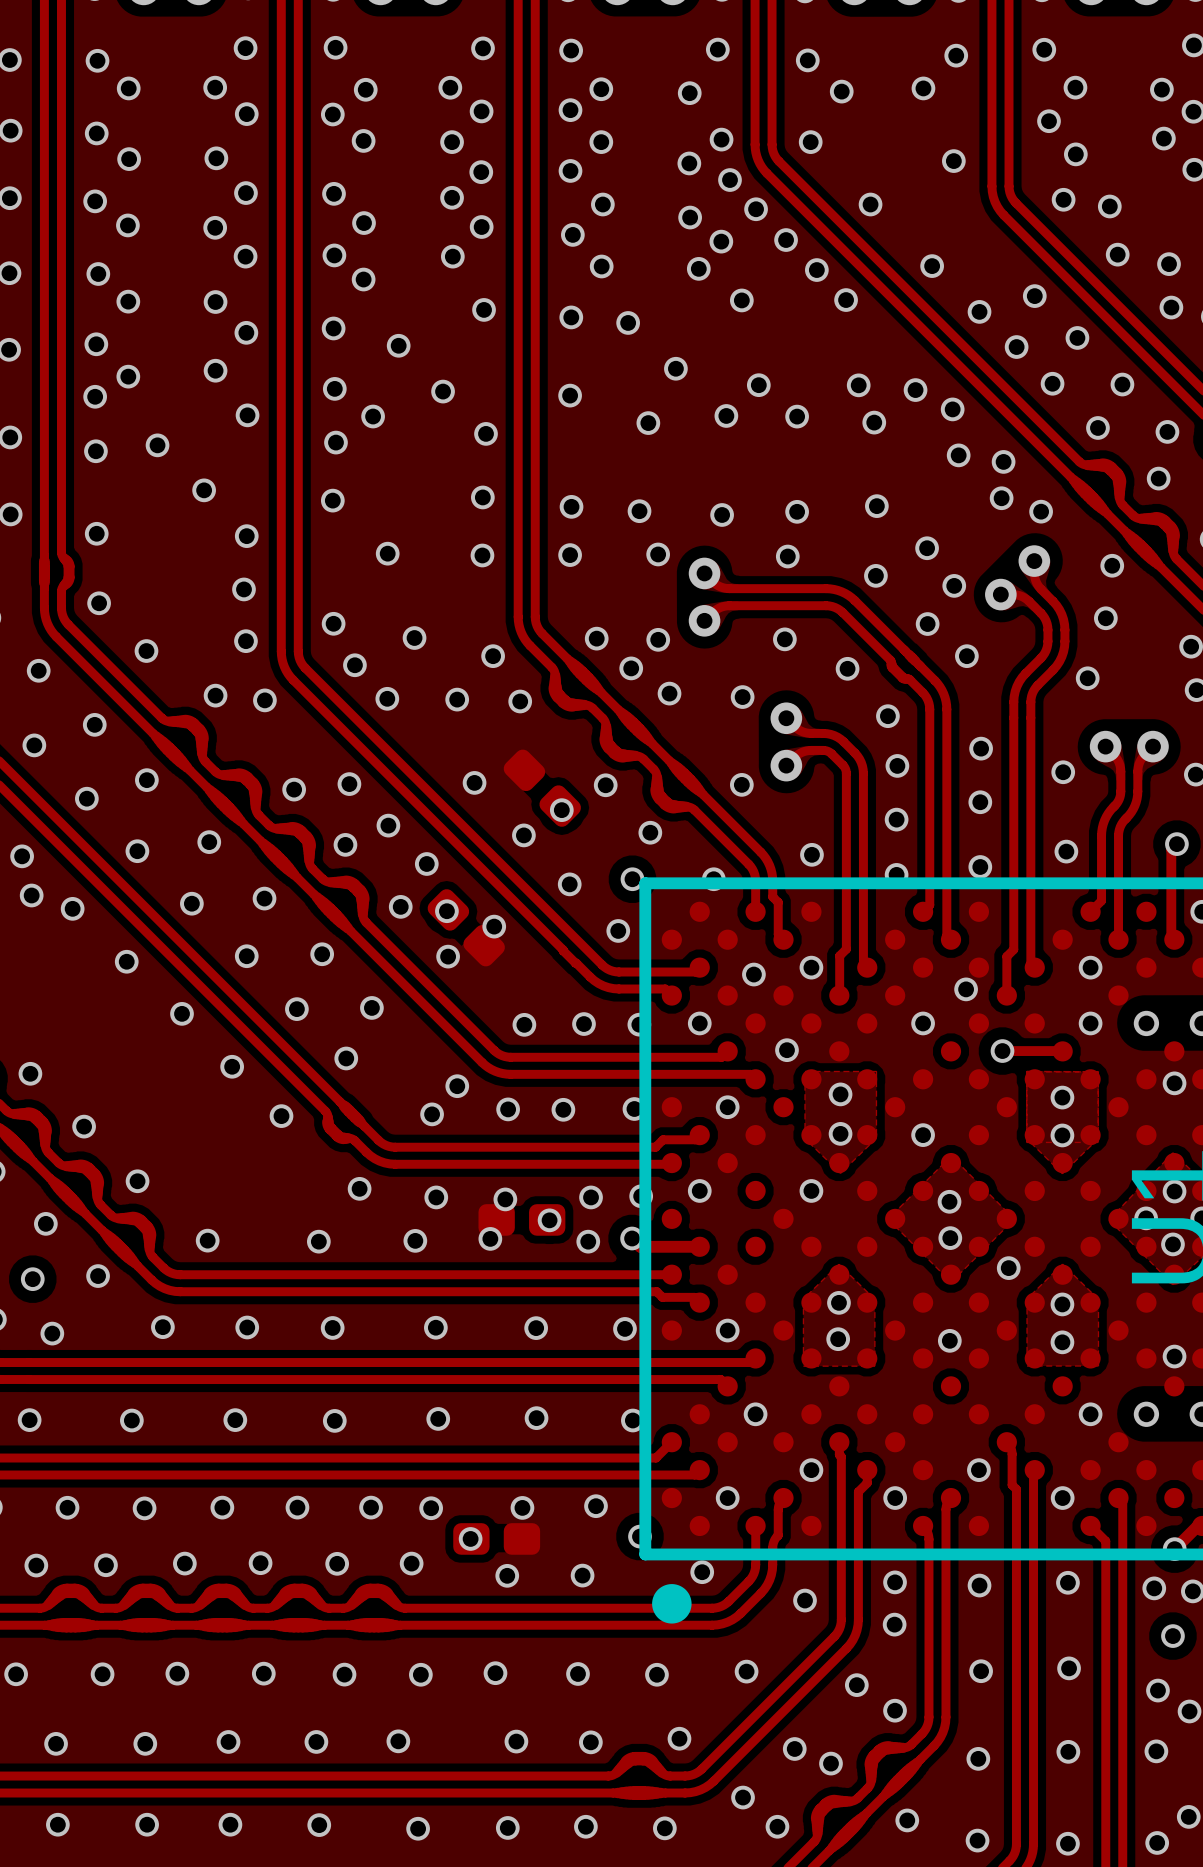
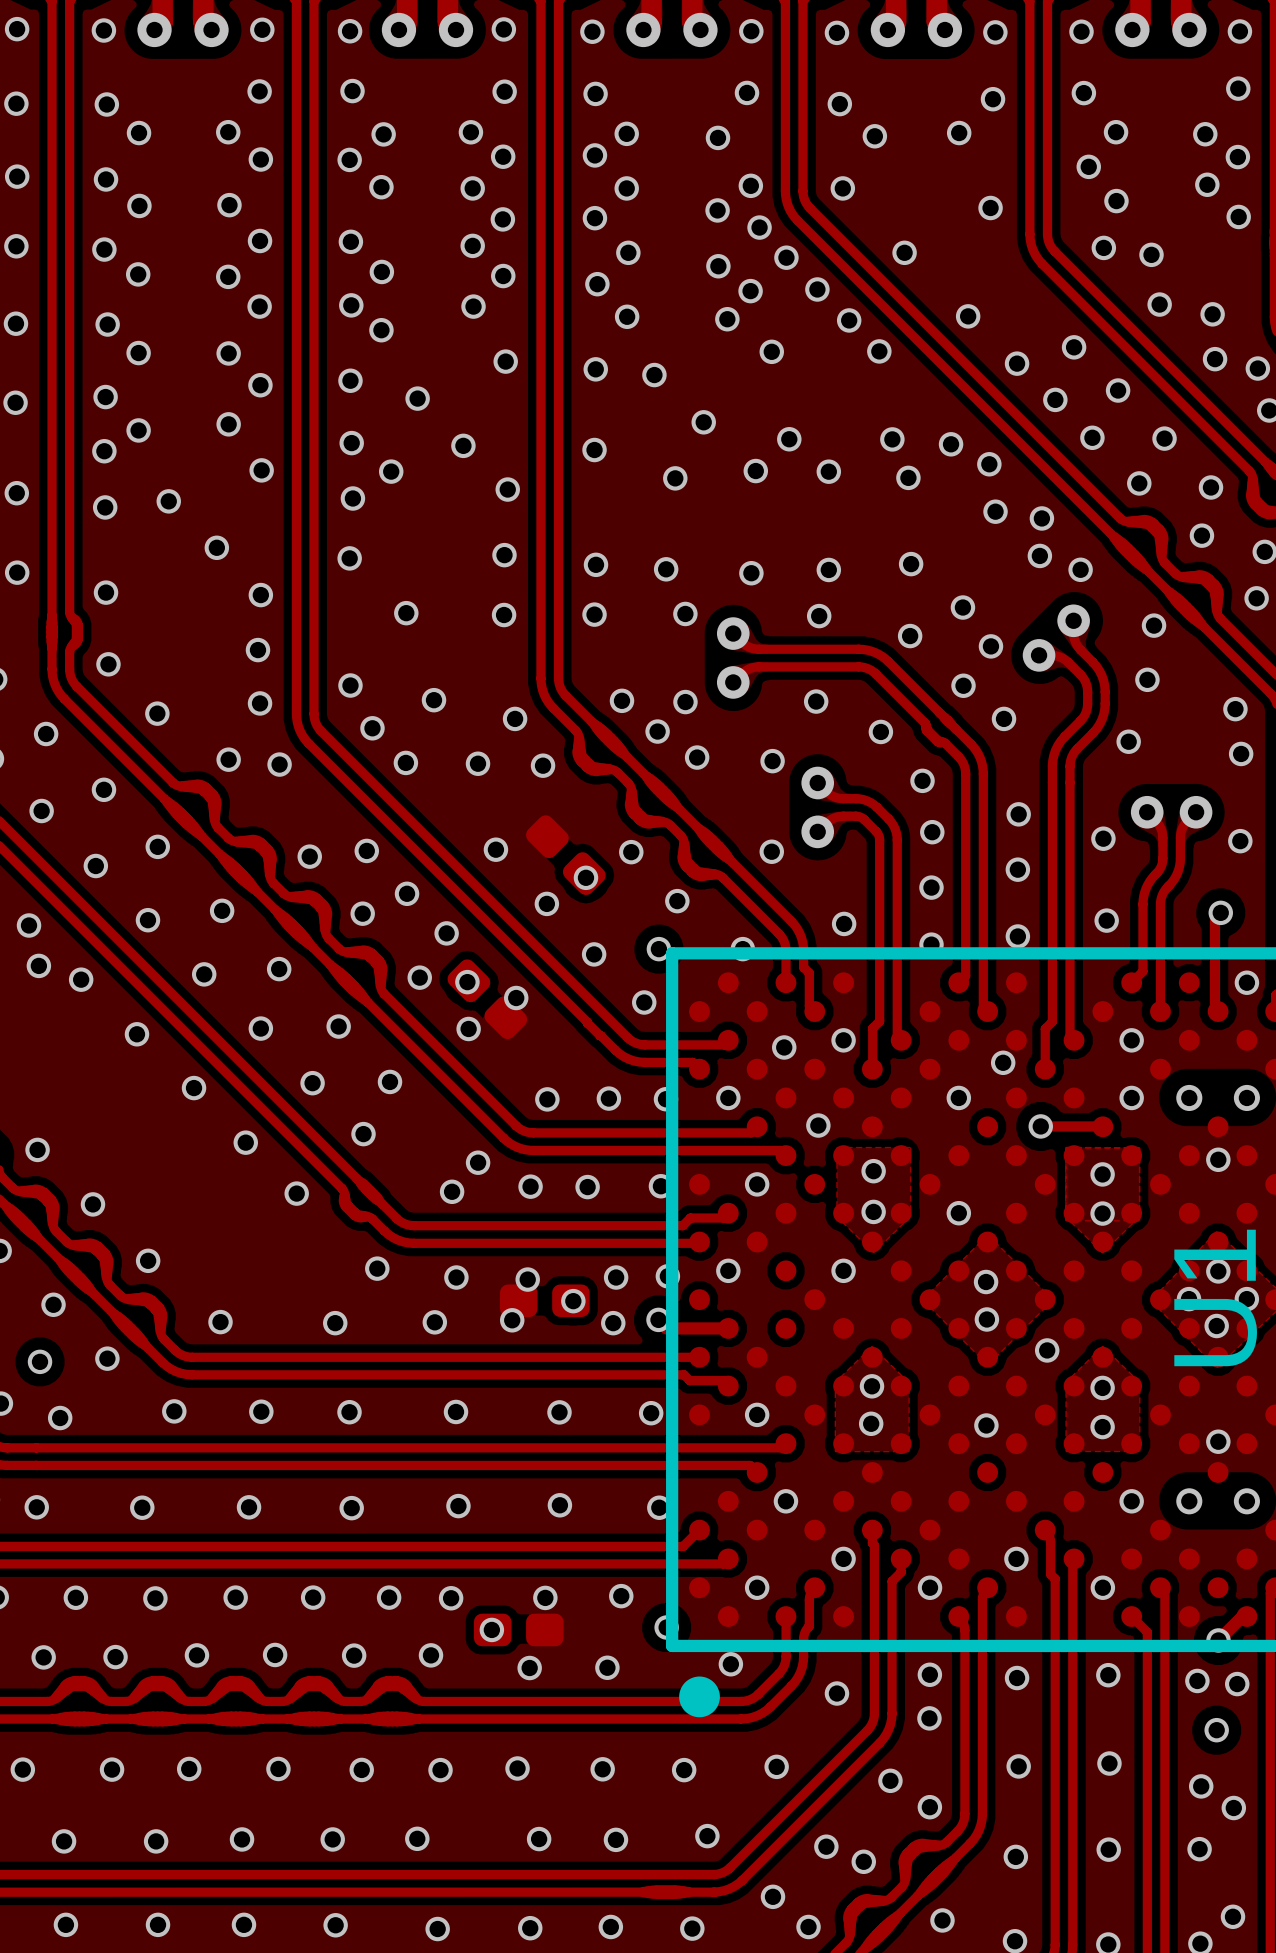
track: (608, 1776) (615, 1773) (629, 1760) (635, 1758) (648, 1760) (663, 1773) (670, 1776) -> (633, 1874) (697, 1874)

